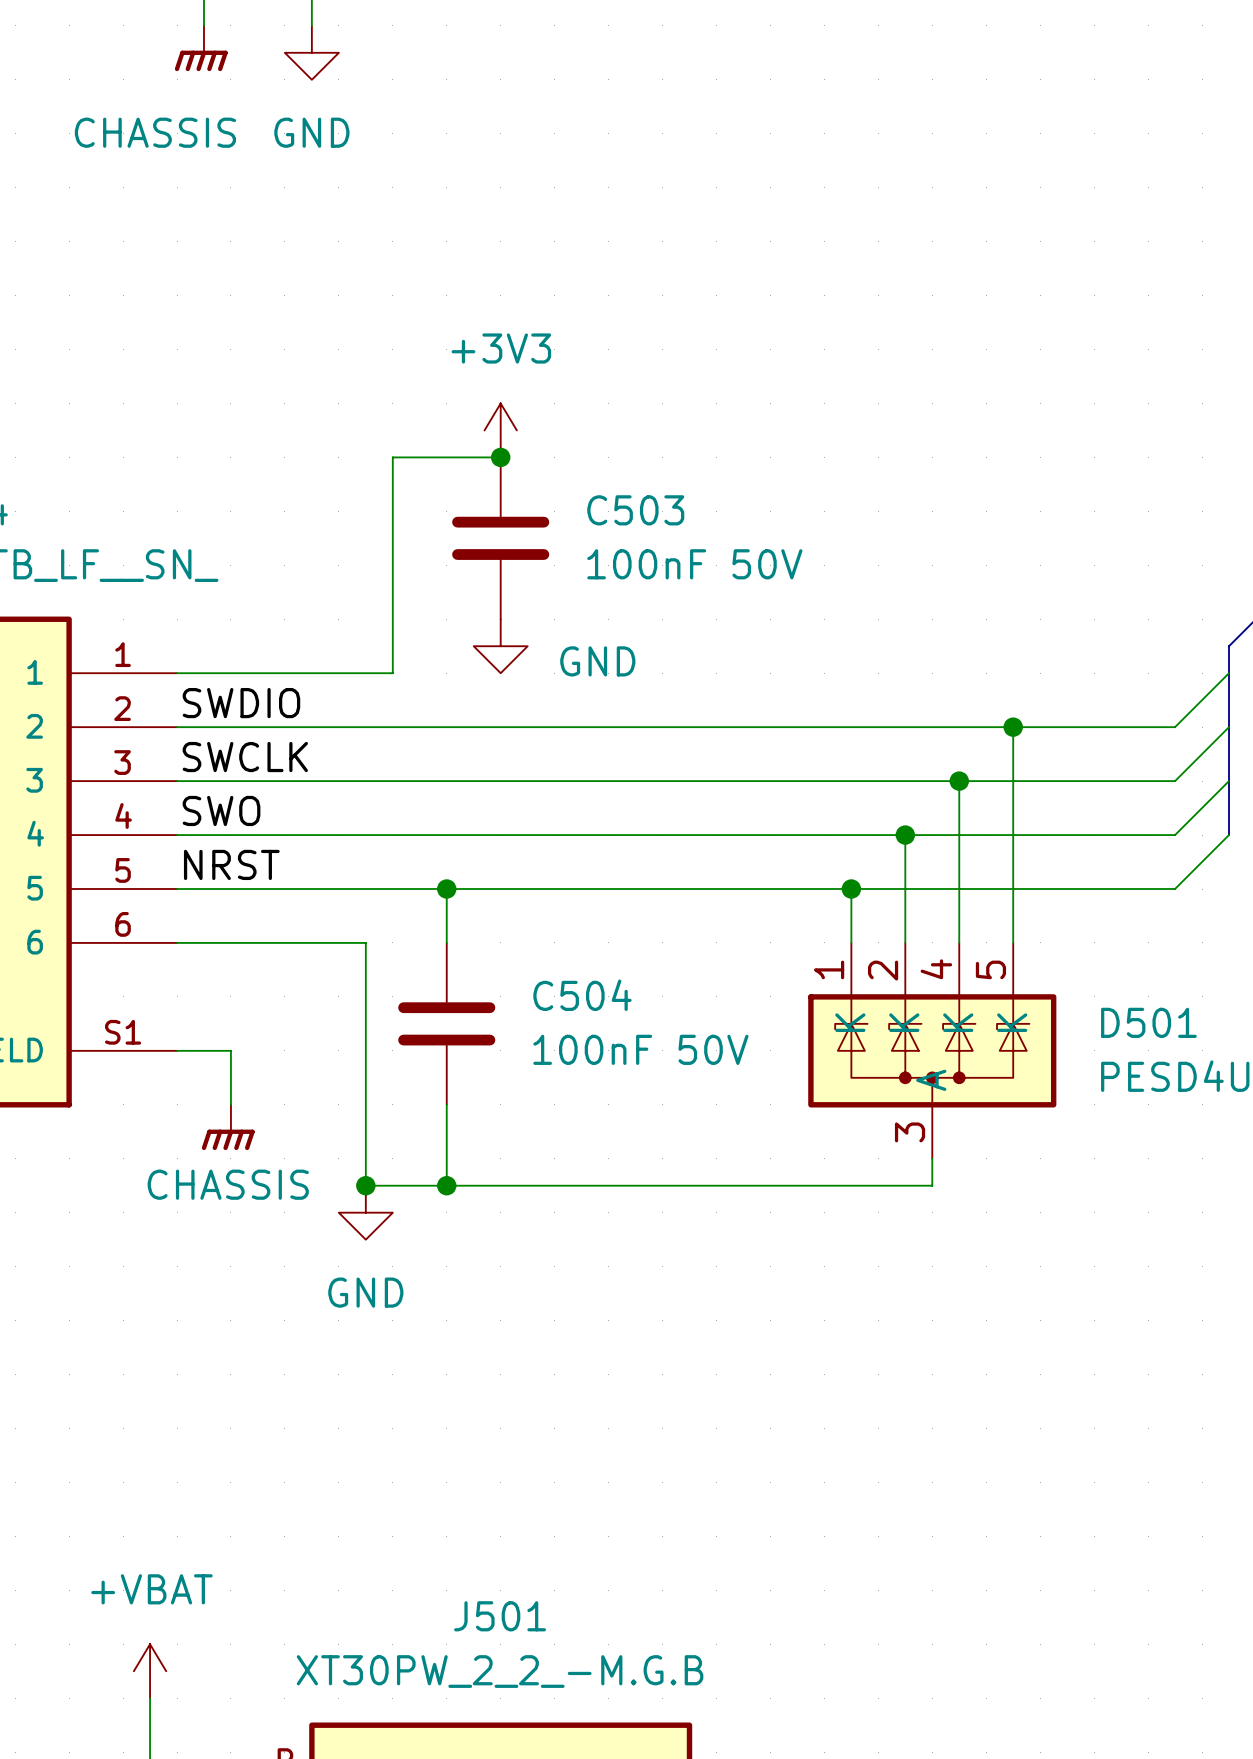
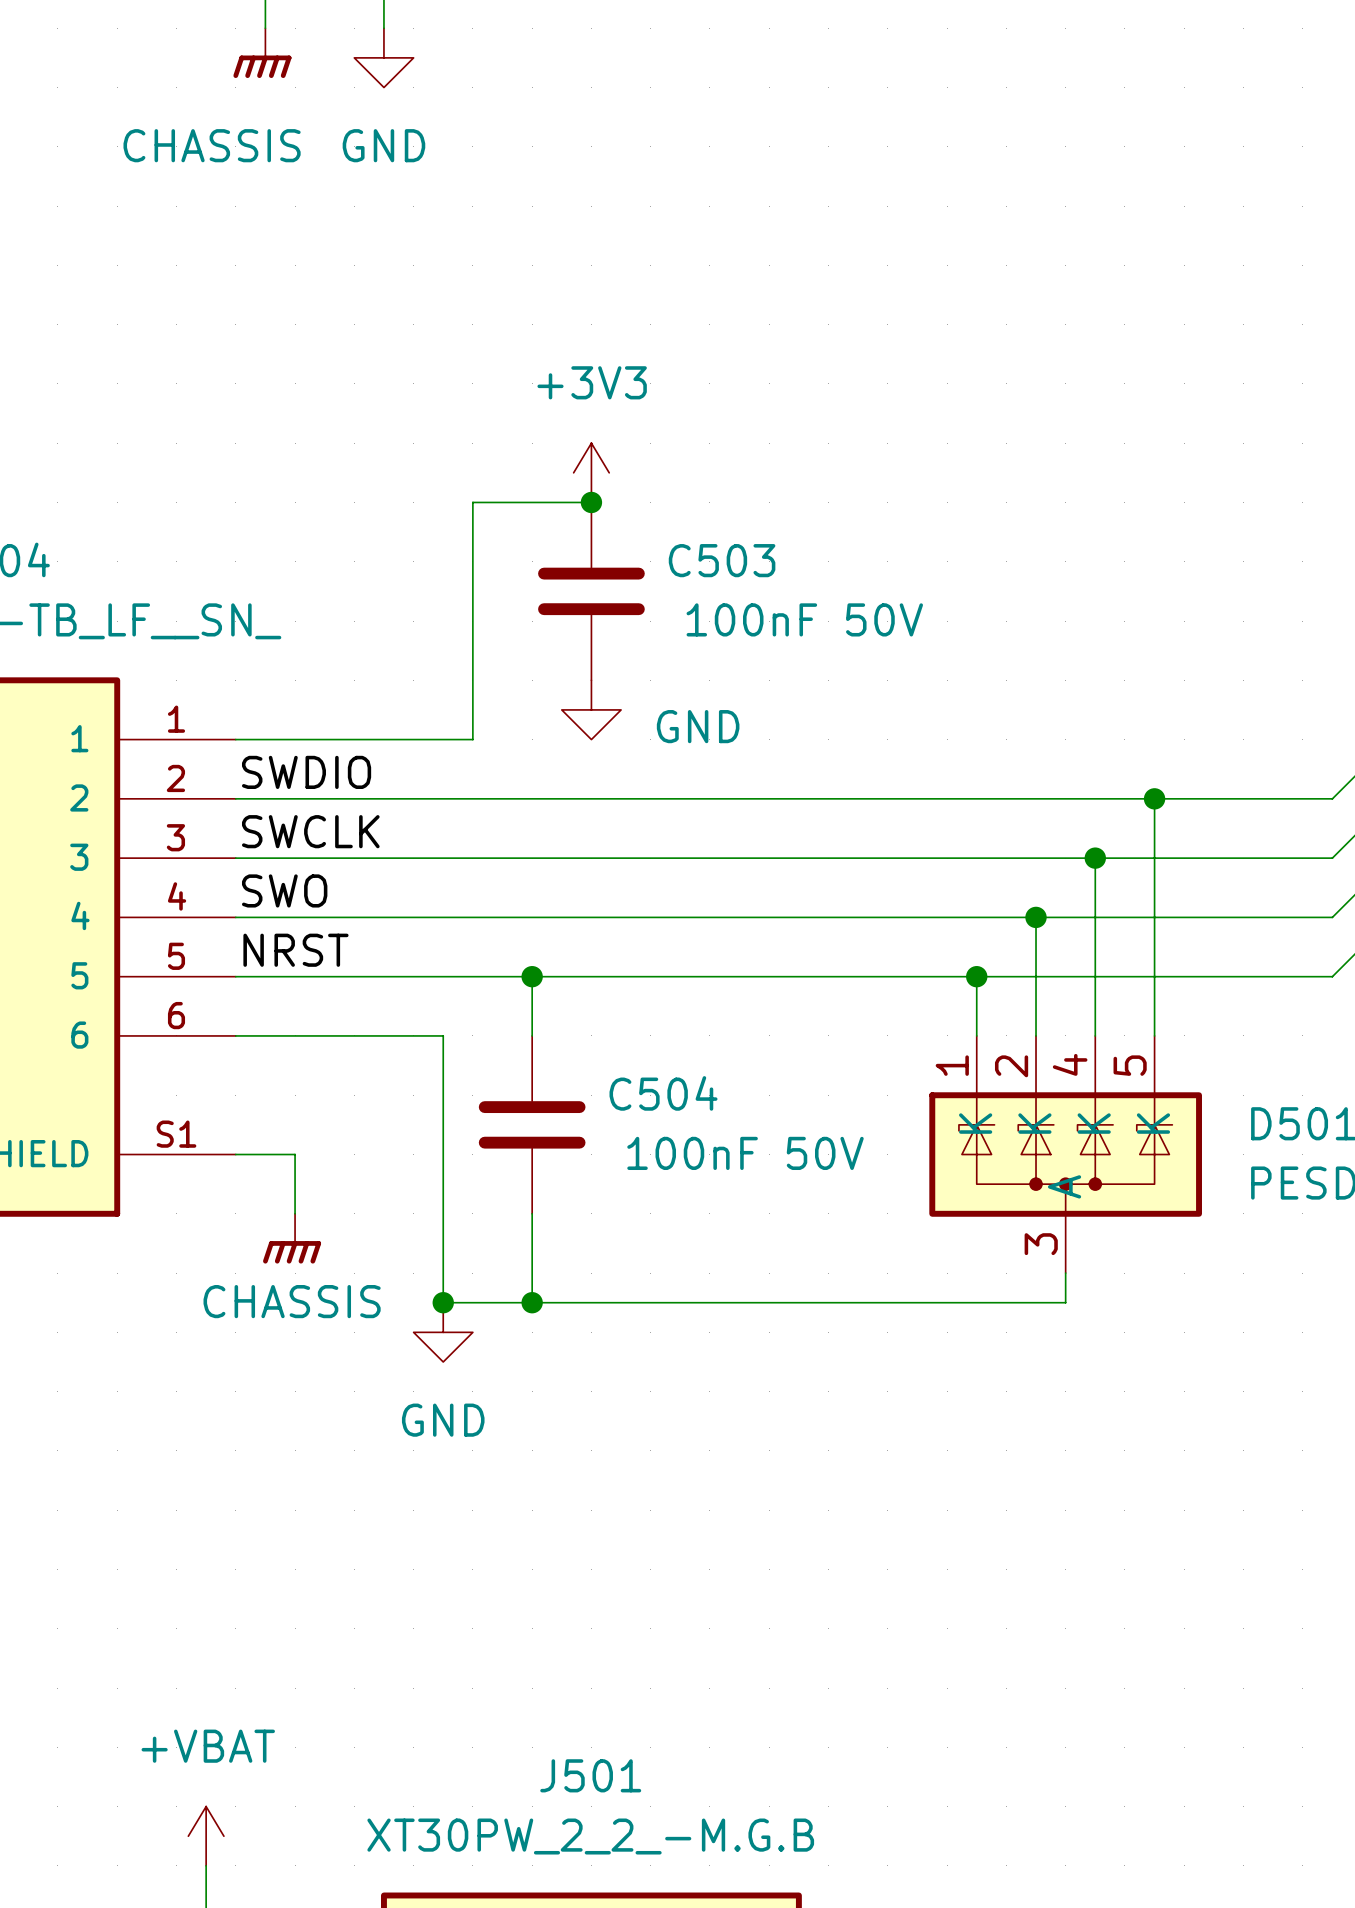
C503 name position: C503 (635, 510) -> C503 (722, 560)
C504 name position: C504 (582, 995) -> C504 (663, 1093)

